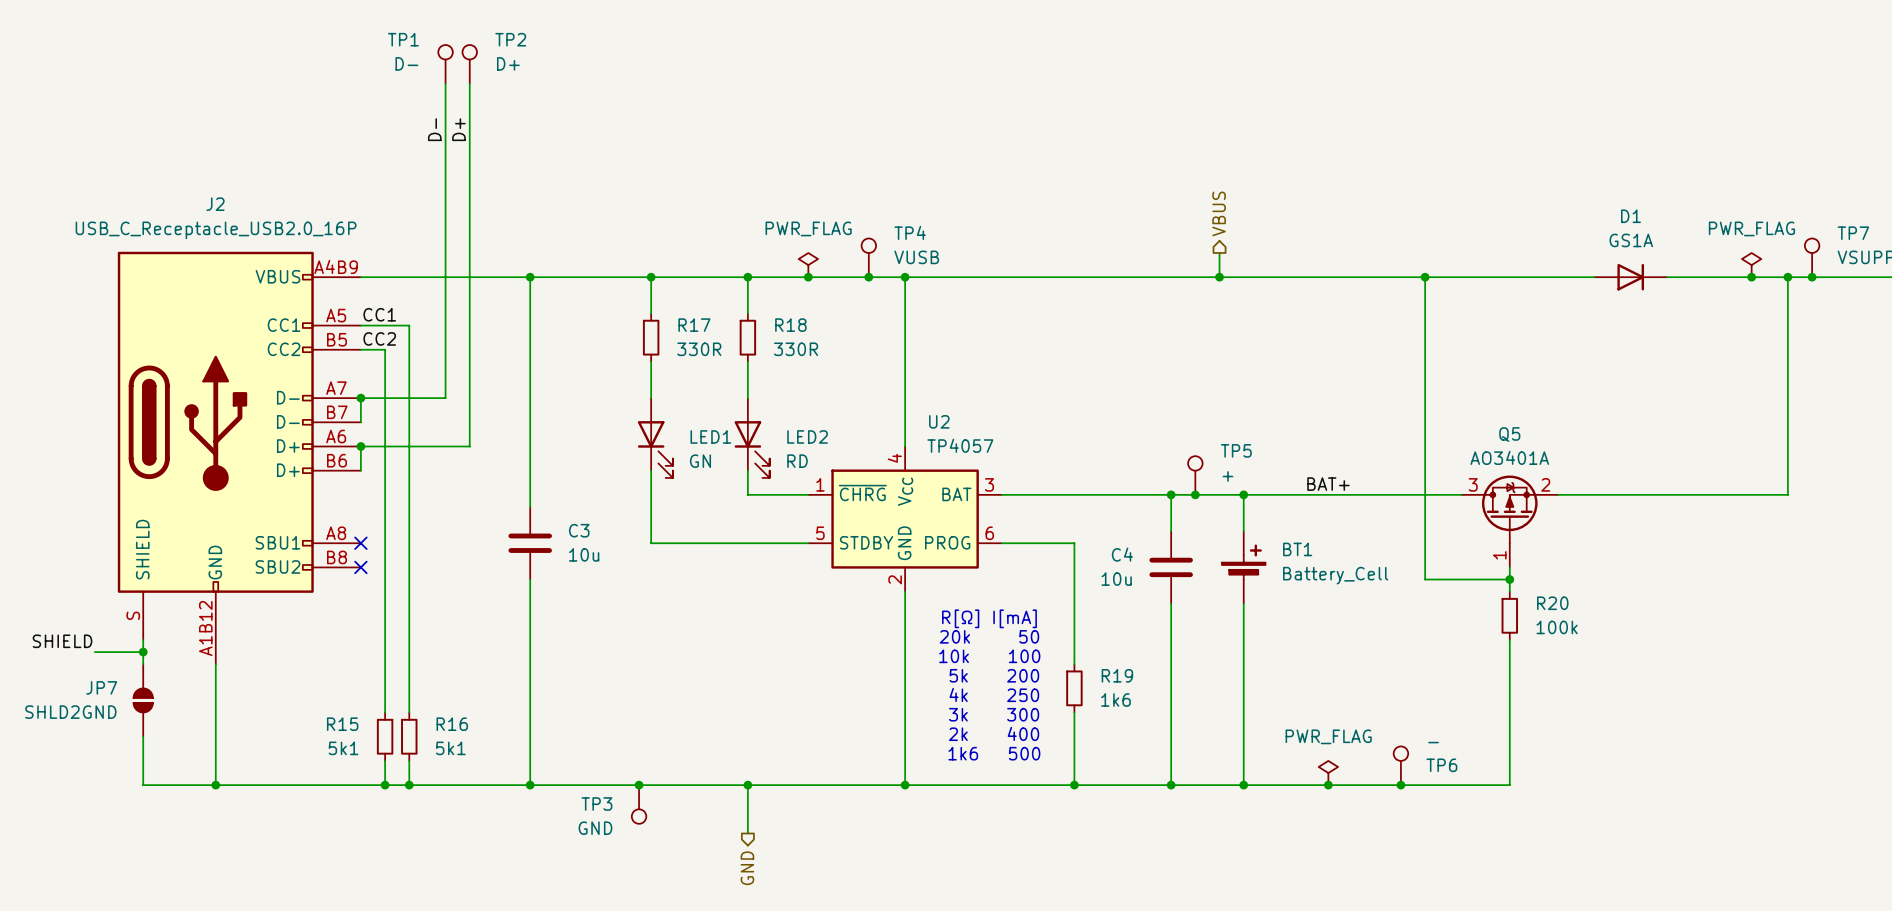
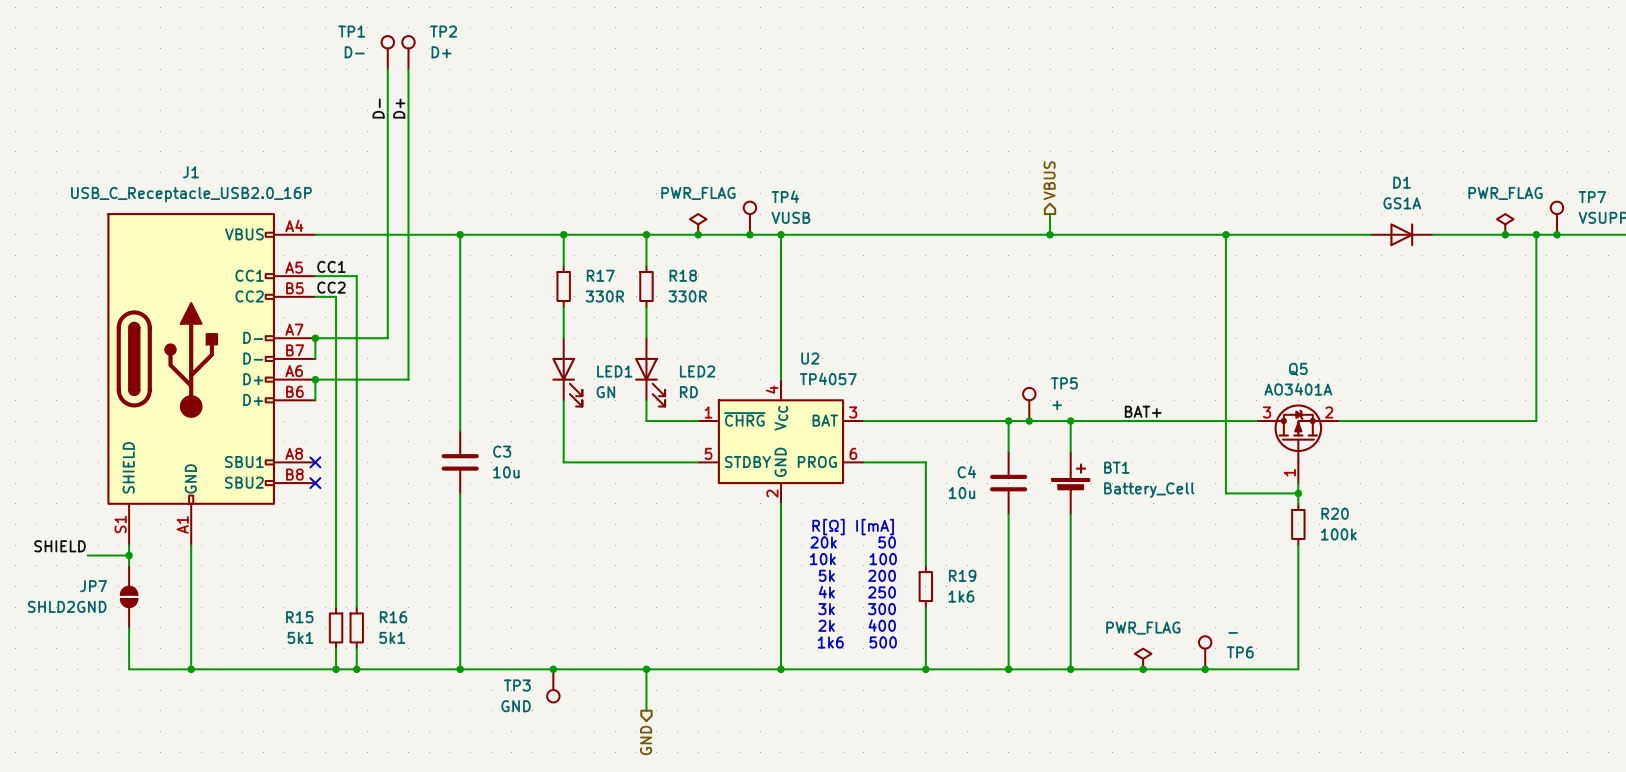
J1: none -> USB_C_Receptacle_USB2.0_16P (211, 379)
J2: USB_C_Receptacle_USB2.0_16P (239, 457) -> none

